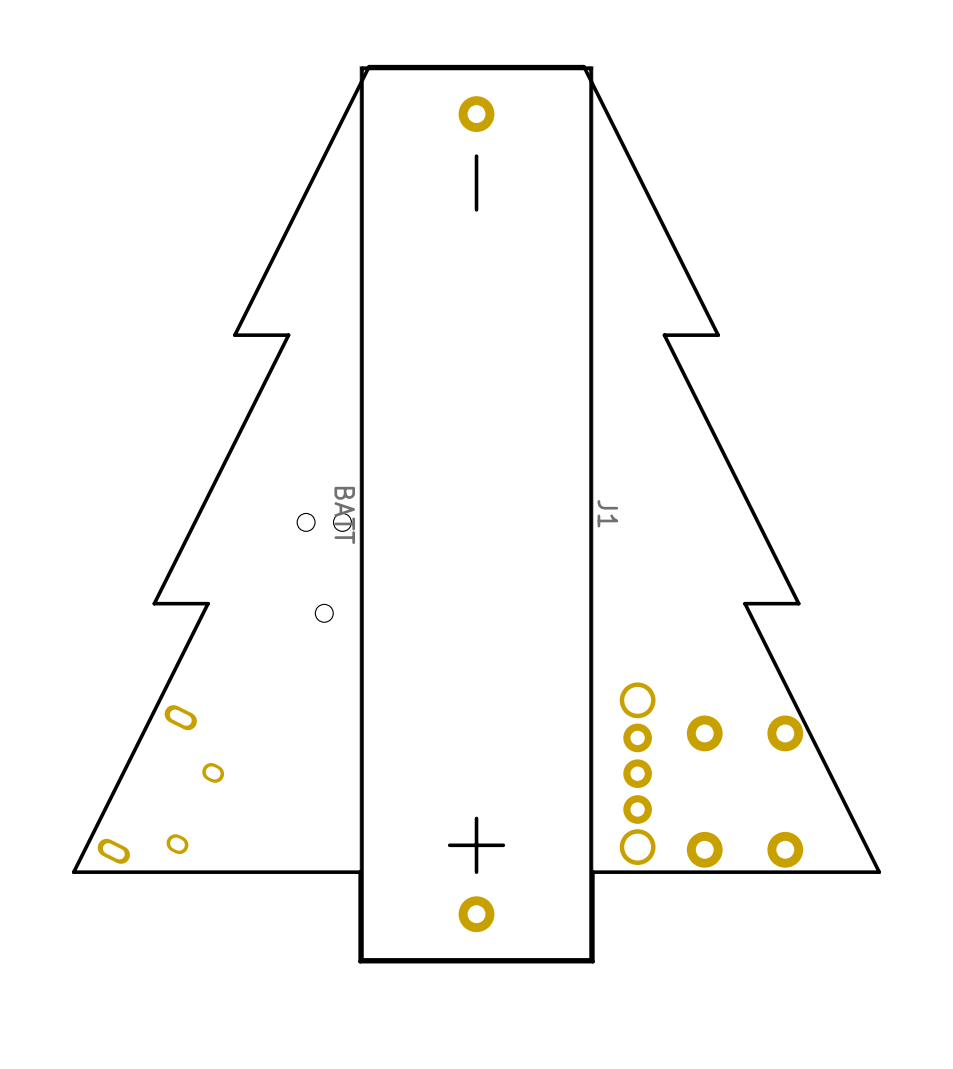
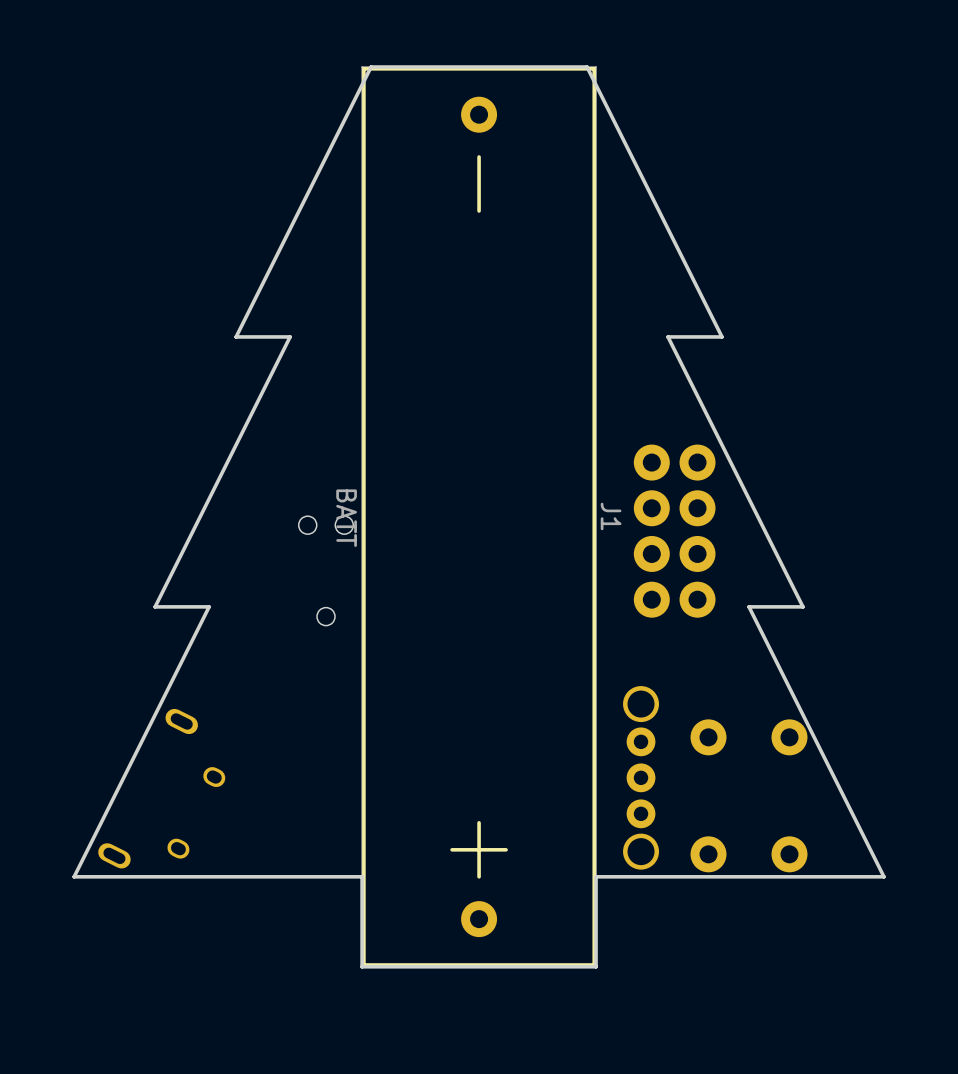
part: none -> (674, 531)

